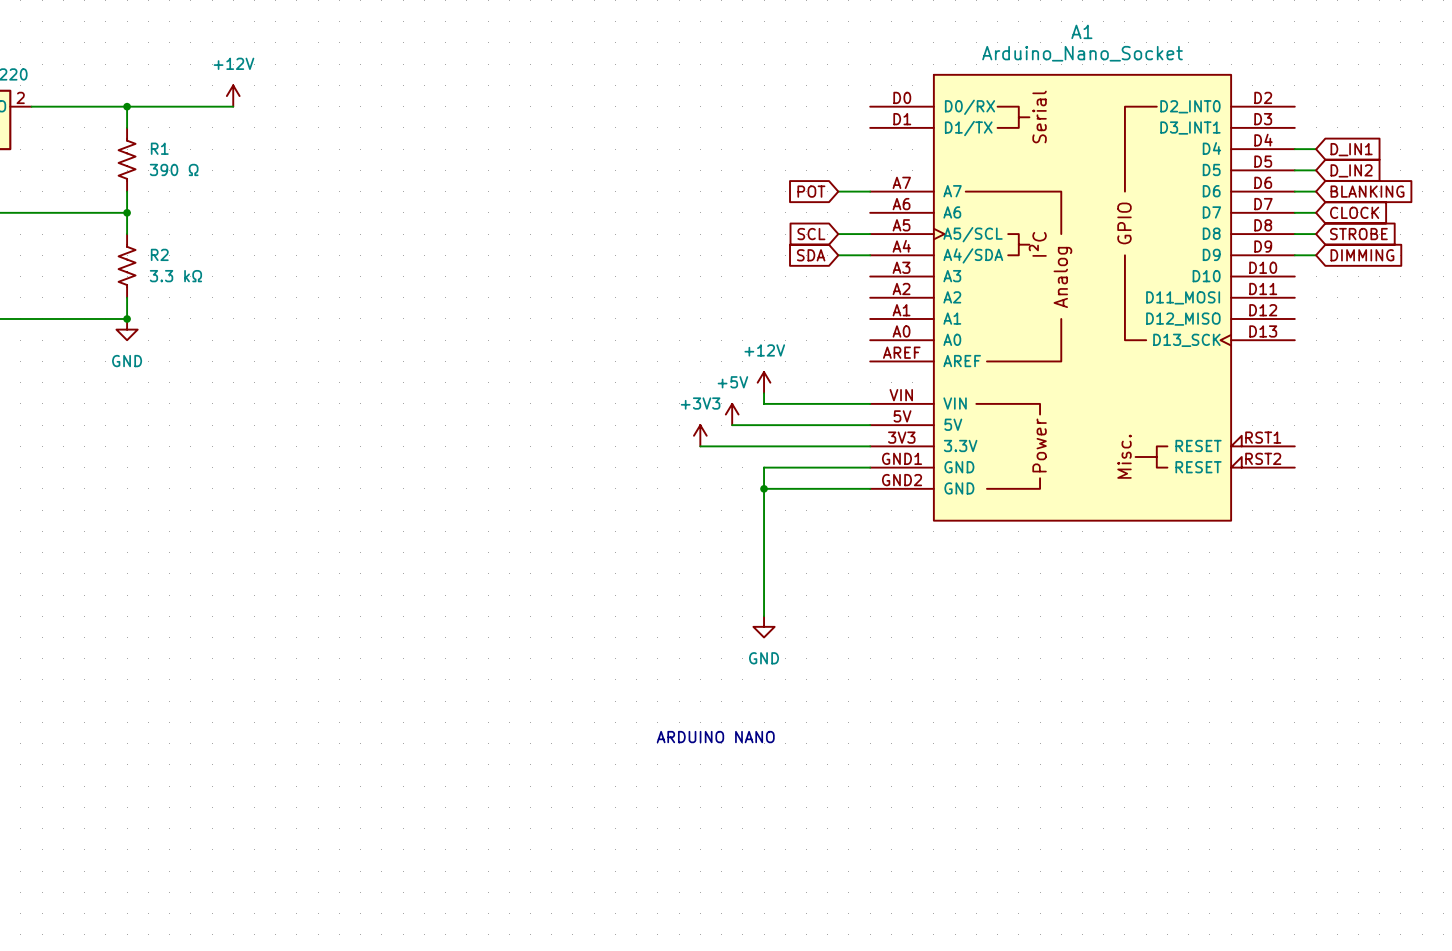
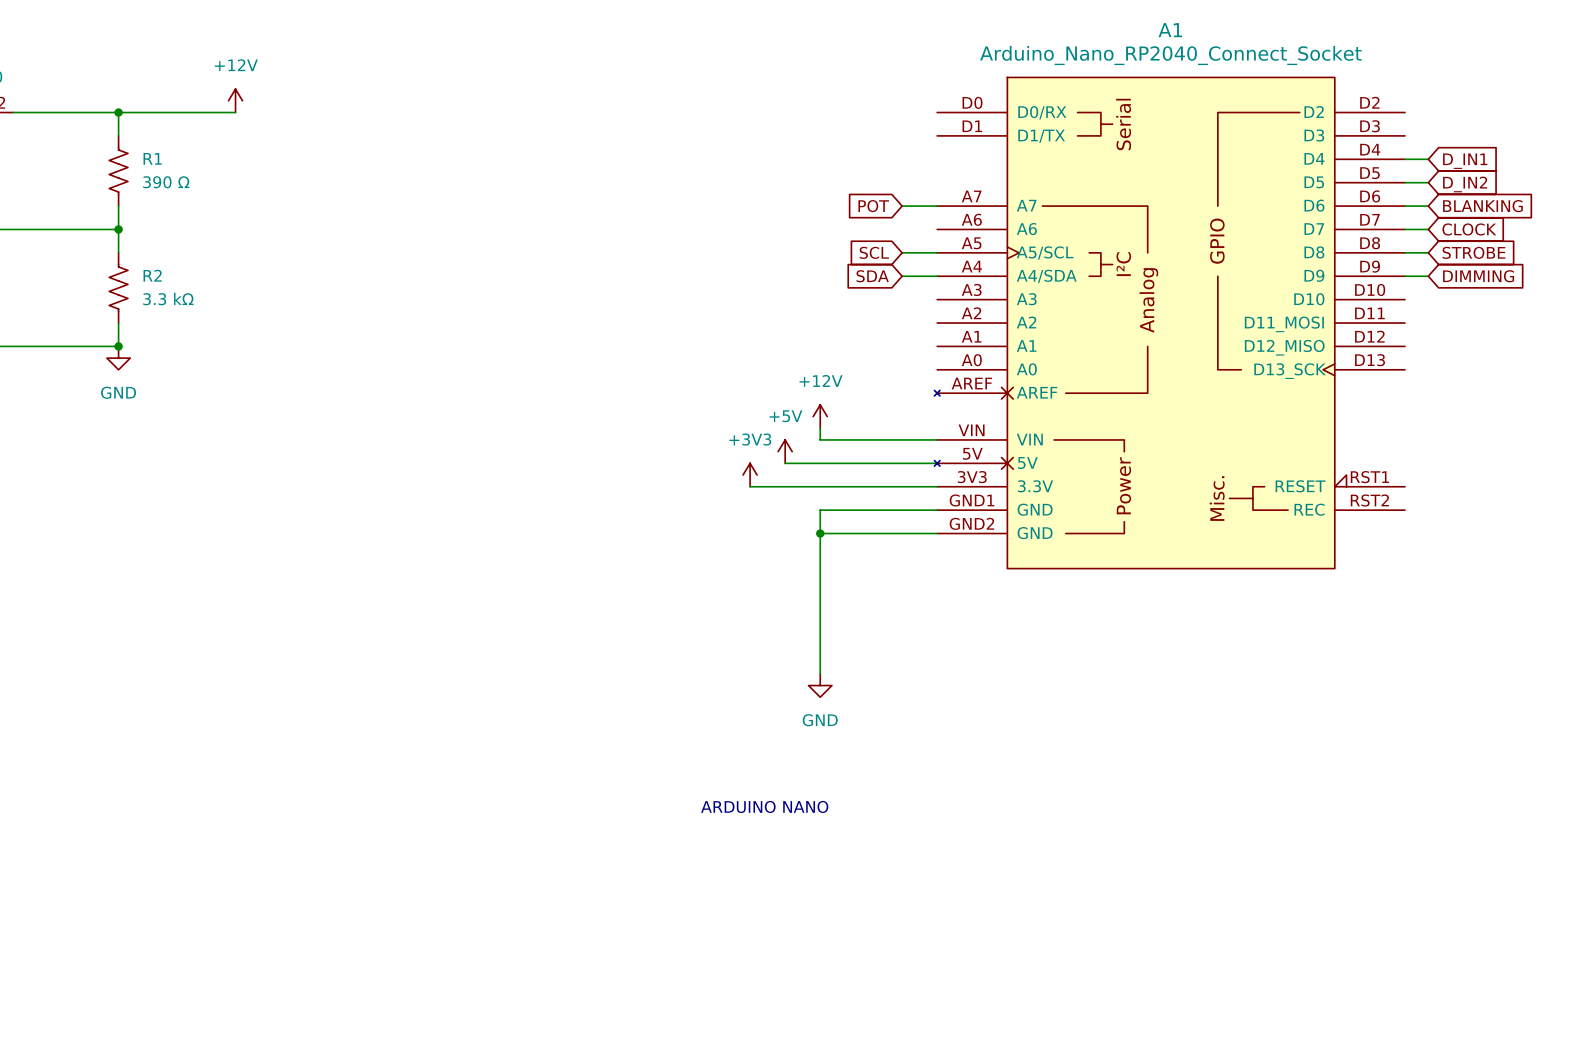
A1 value: Arduino_Nano_Socket (1082, 53) -> Arduino_Nano_RP2040_Connect_Socket (1170, 55)
A1 symbol: [870, 74, 1295, 521] -> [934, 77, 1405, 569]

